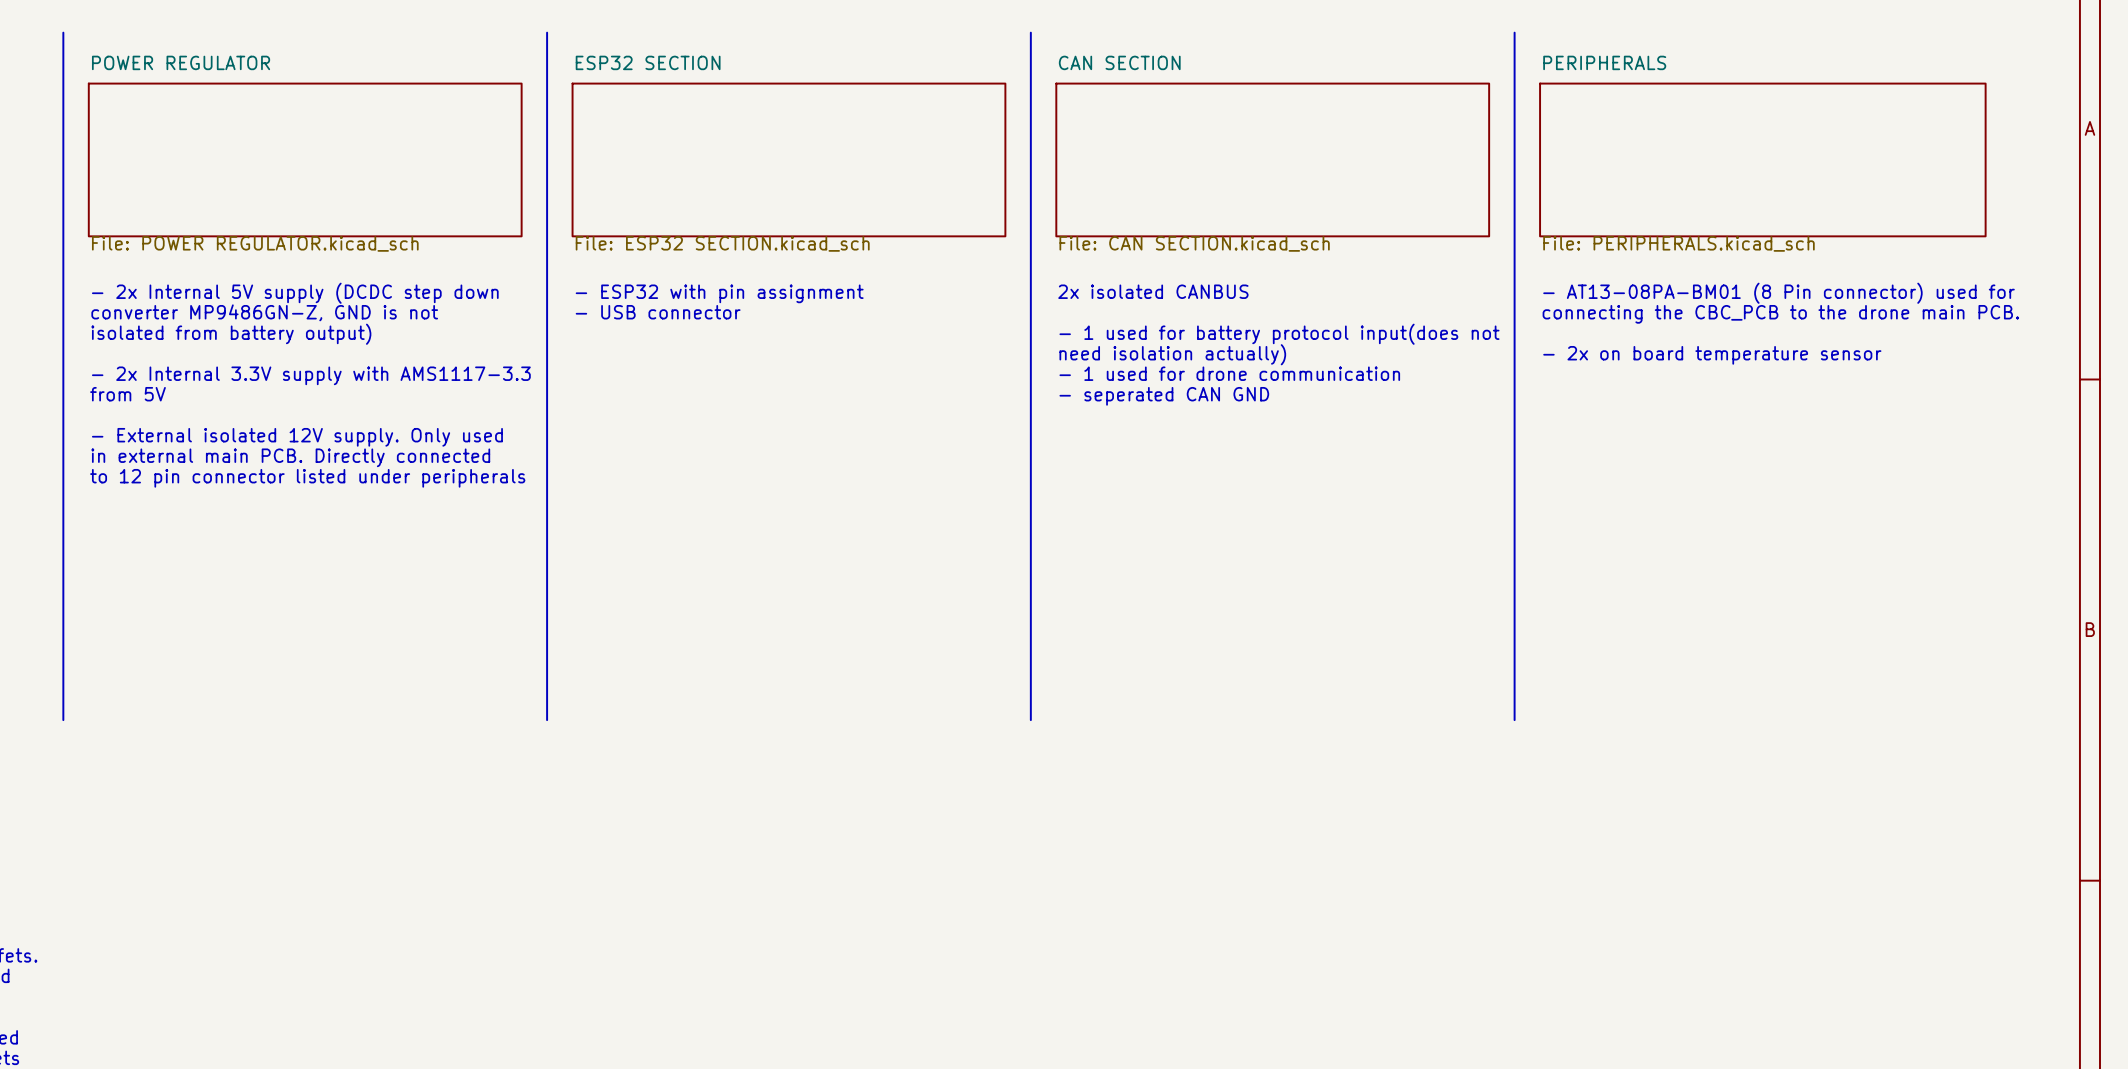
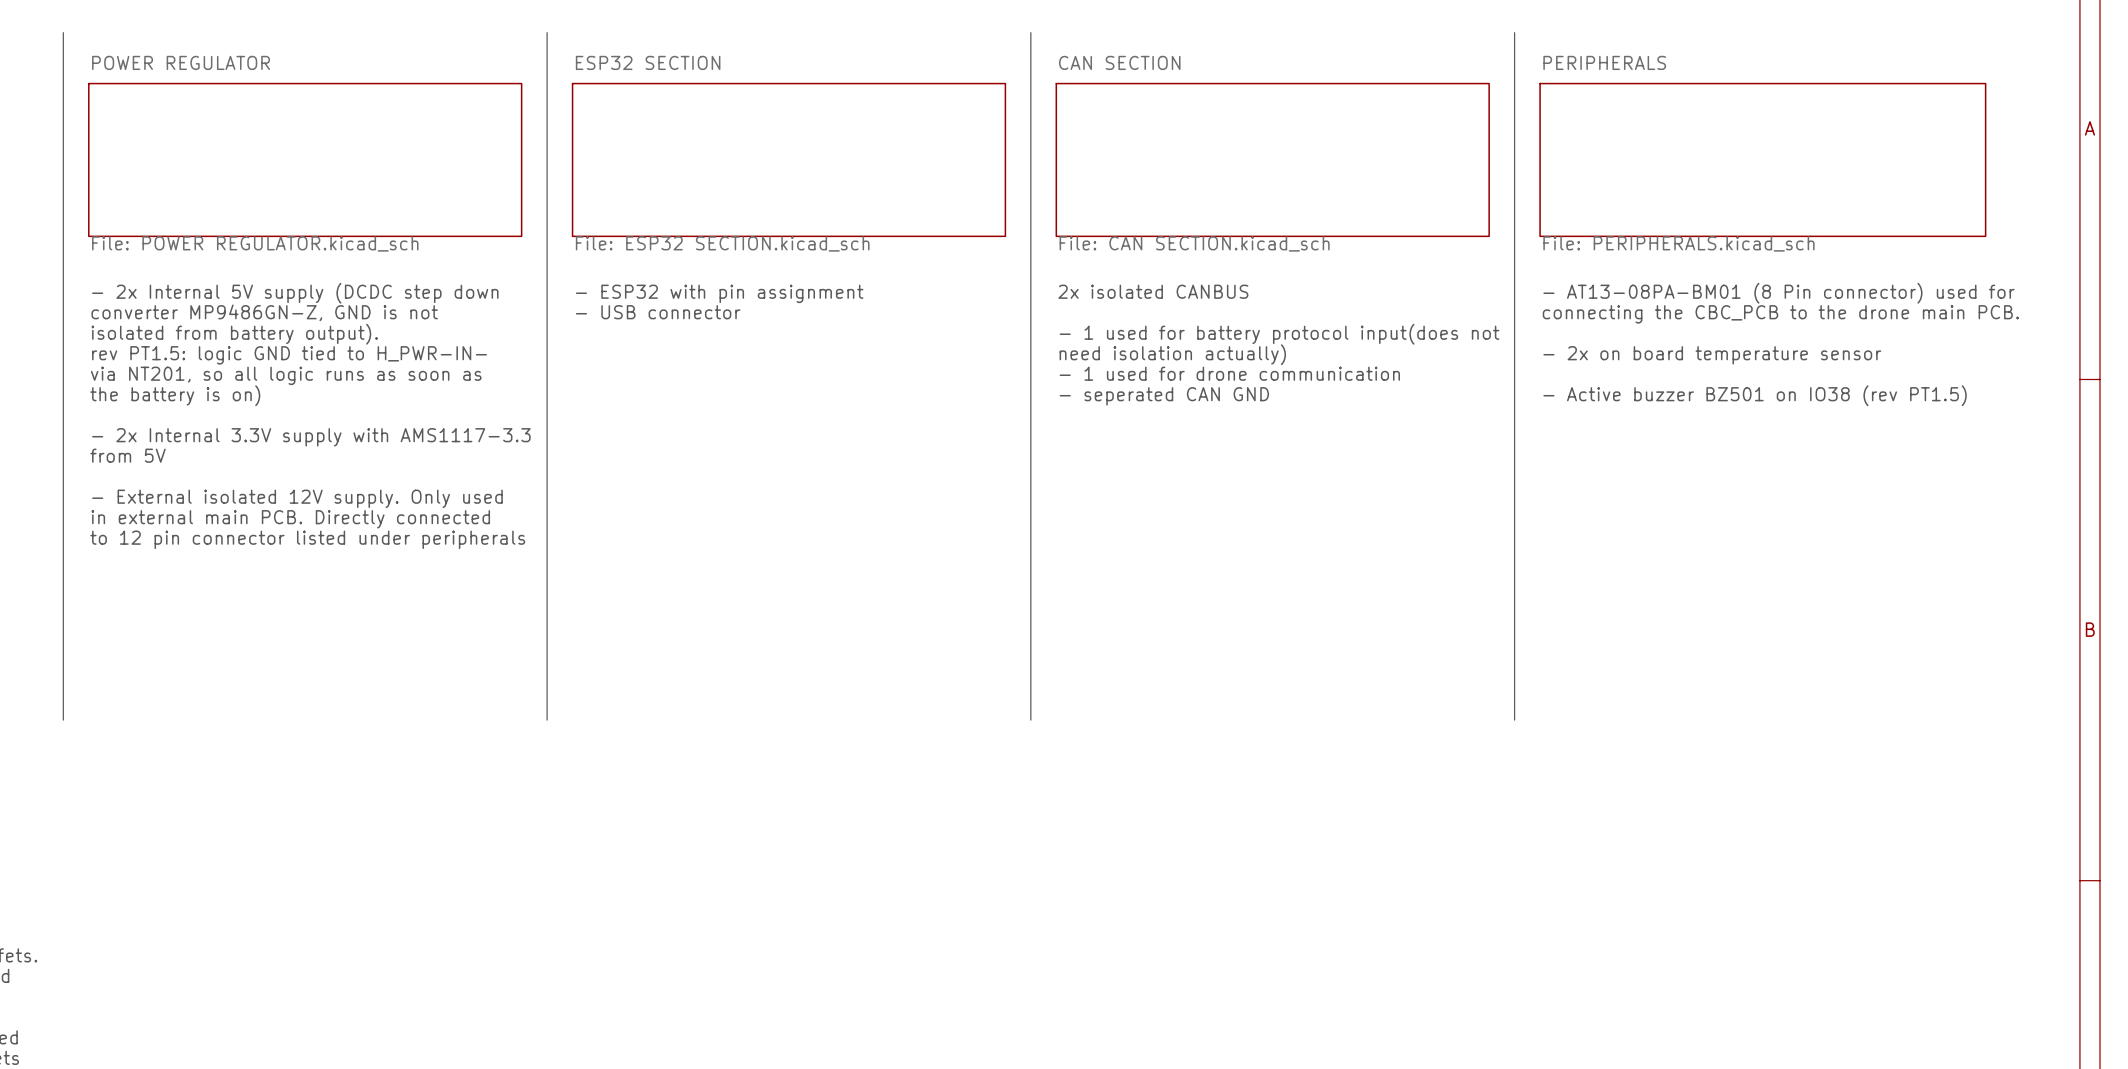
text: isolated from battery output) (231, 334) -> isolated from battery output). (234, 334)
text: none -> rev PT1.5: logic GND tied to H_PWR-IN- (289, 355)
text: - 2x Internal 3.3V supply with AMS1117-3.3 (311, 375) -> via NT201, so all logic runs as soon as (286, 375)
text: from 5V (128, 394) -> the battery is on) (175, 395)
text: none -> - Active buzzer BZ501 on IO38 (rev PT1.5) (1755, 395)
text: - External isolated 12V supply. Only used (297, 437) -> - 2x Internal 3.3V supply with AMS1117-3.3 (311, 437)
text: in external main PCB. Directly connected (290, 457) -> from 5V (128, 455)
text position: to 12 pin connector listed under peripherals (307, 478) -> to 12 pin connector listed under peripherals (307, 539)
text: none -> - External isolated 12V supply. Only used (297, 498)
text: none -> in external main PCB. Directly connected (290, 519)

